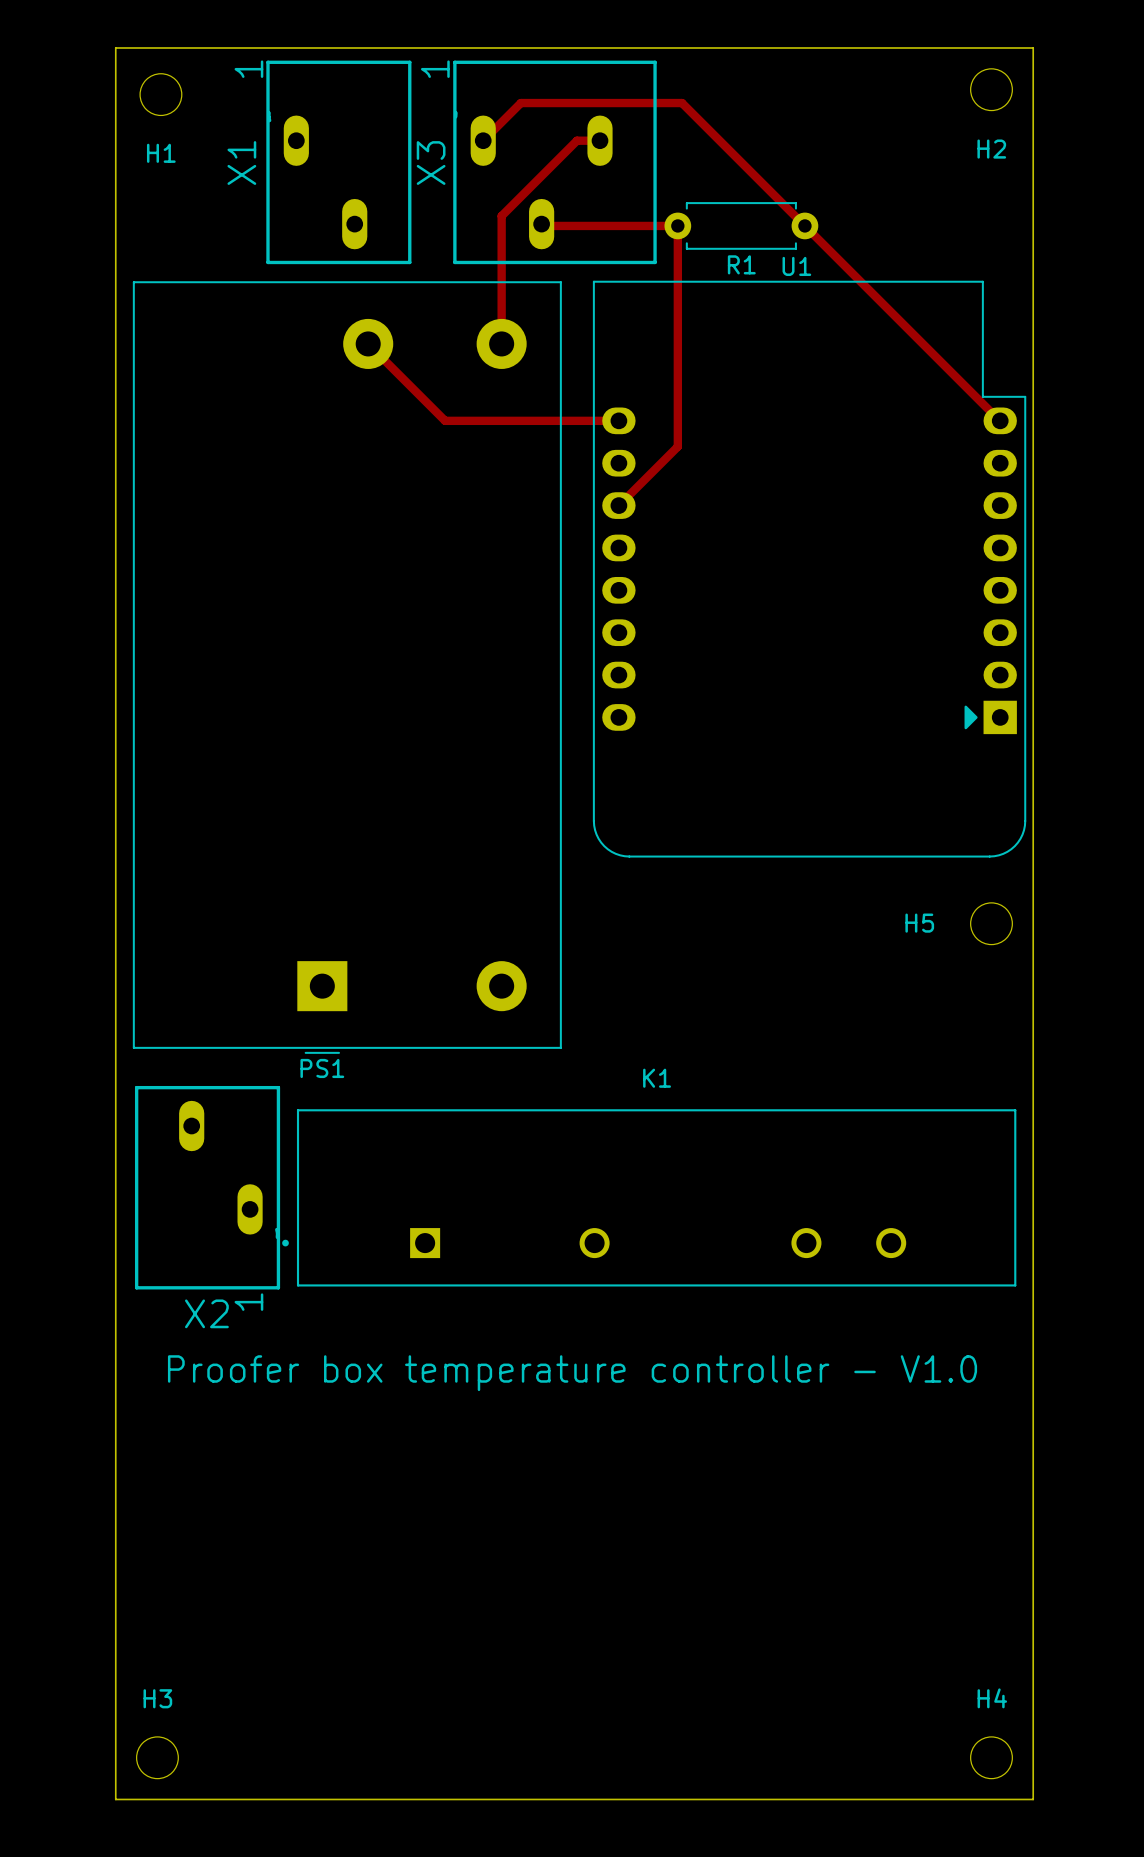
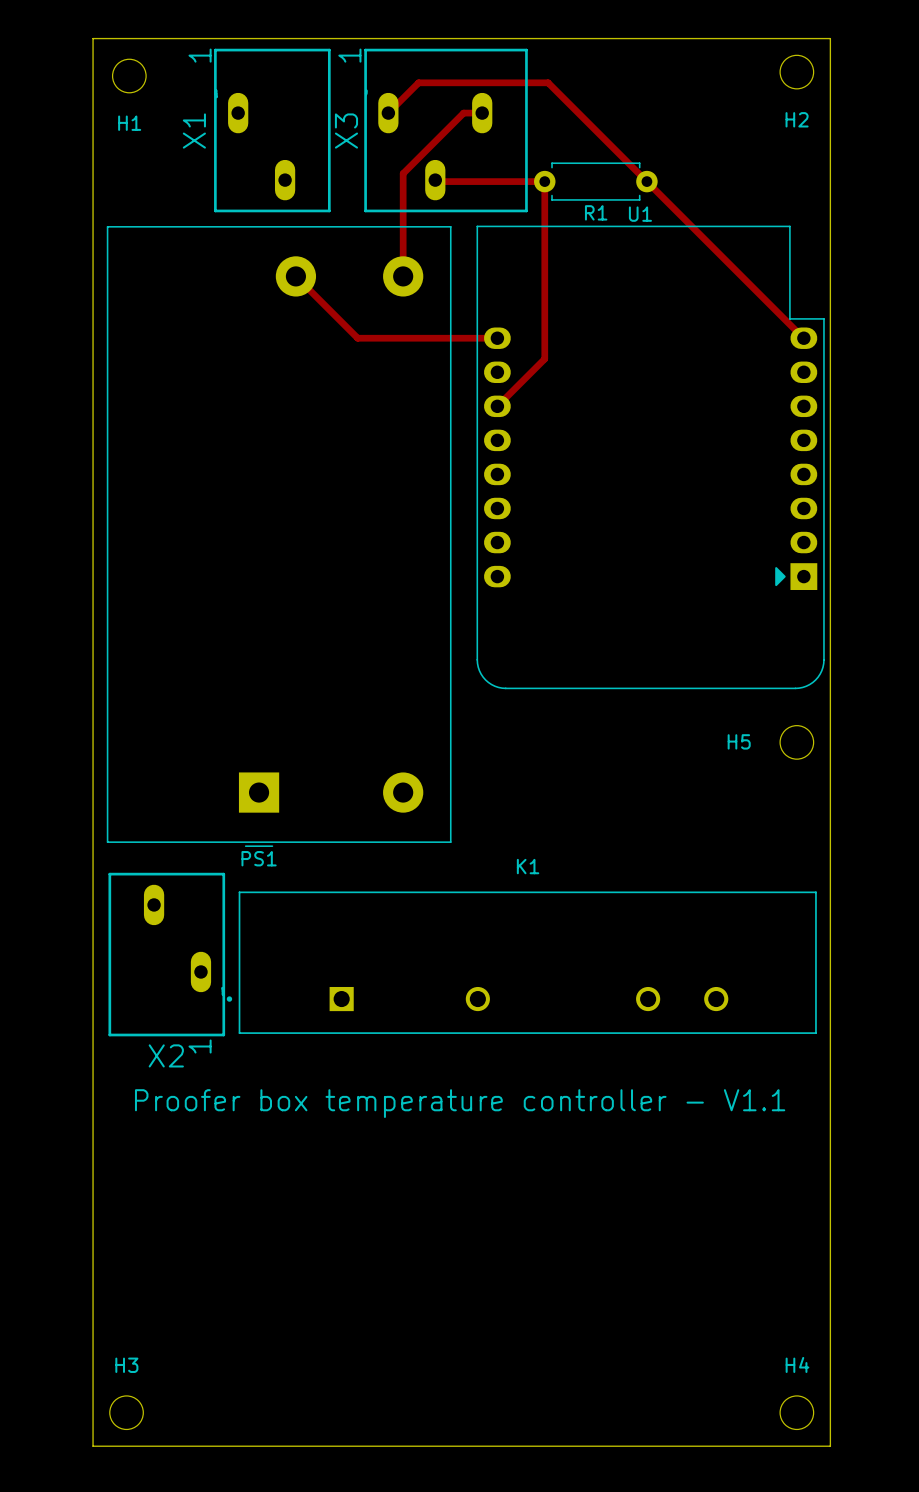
text: Proofer box temperature controller - V1.0 (572, 1373) -> Proofer box temperature controller - V1.1 (460, 1103)

